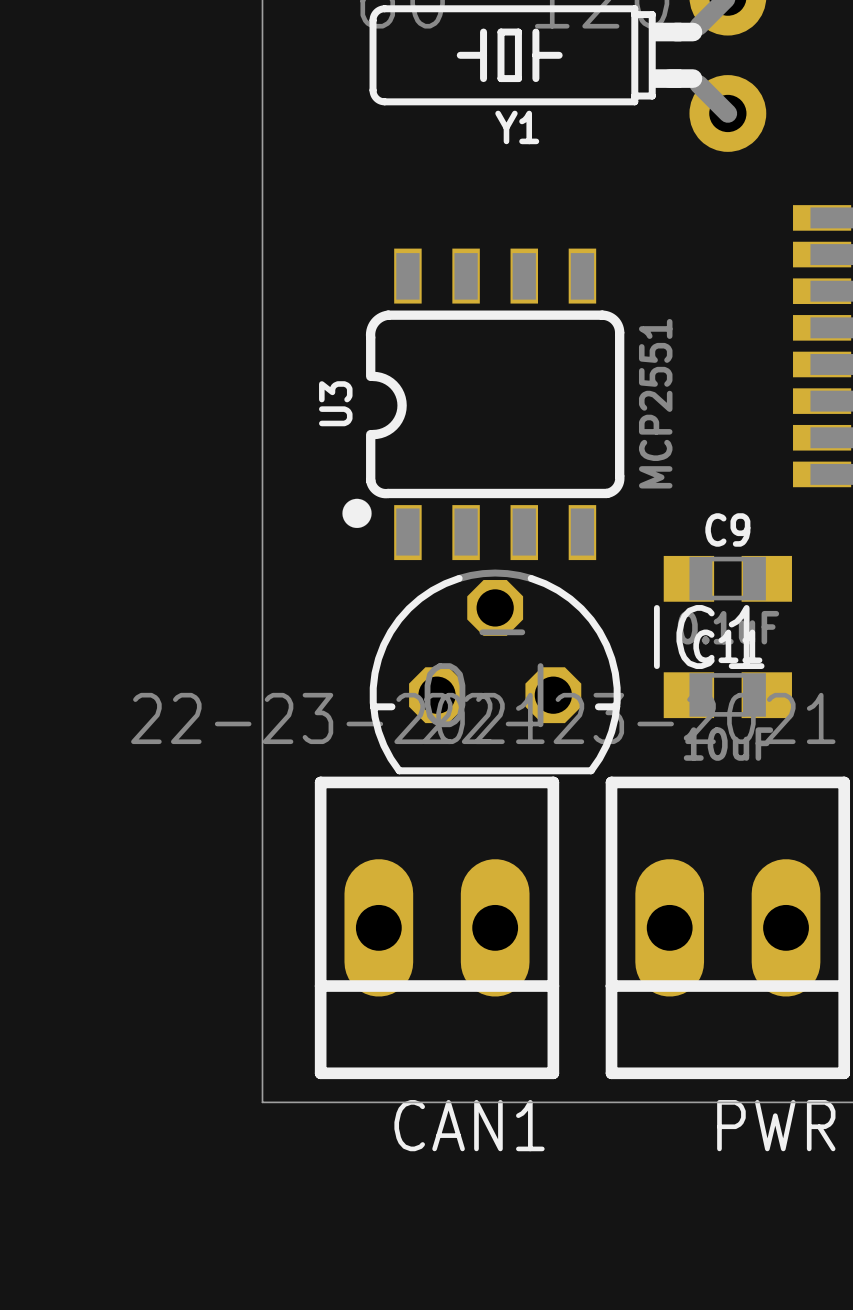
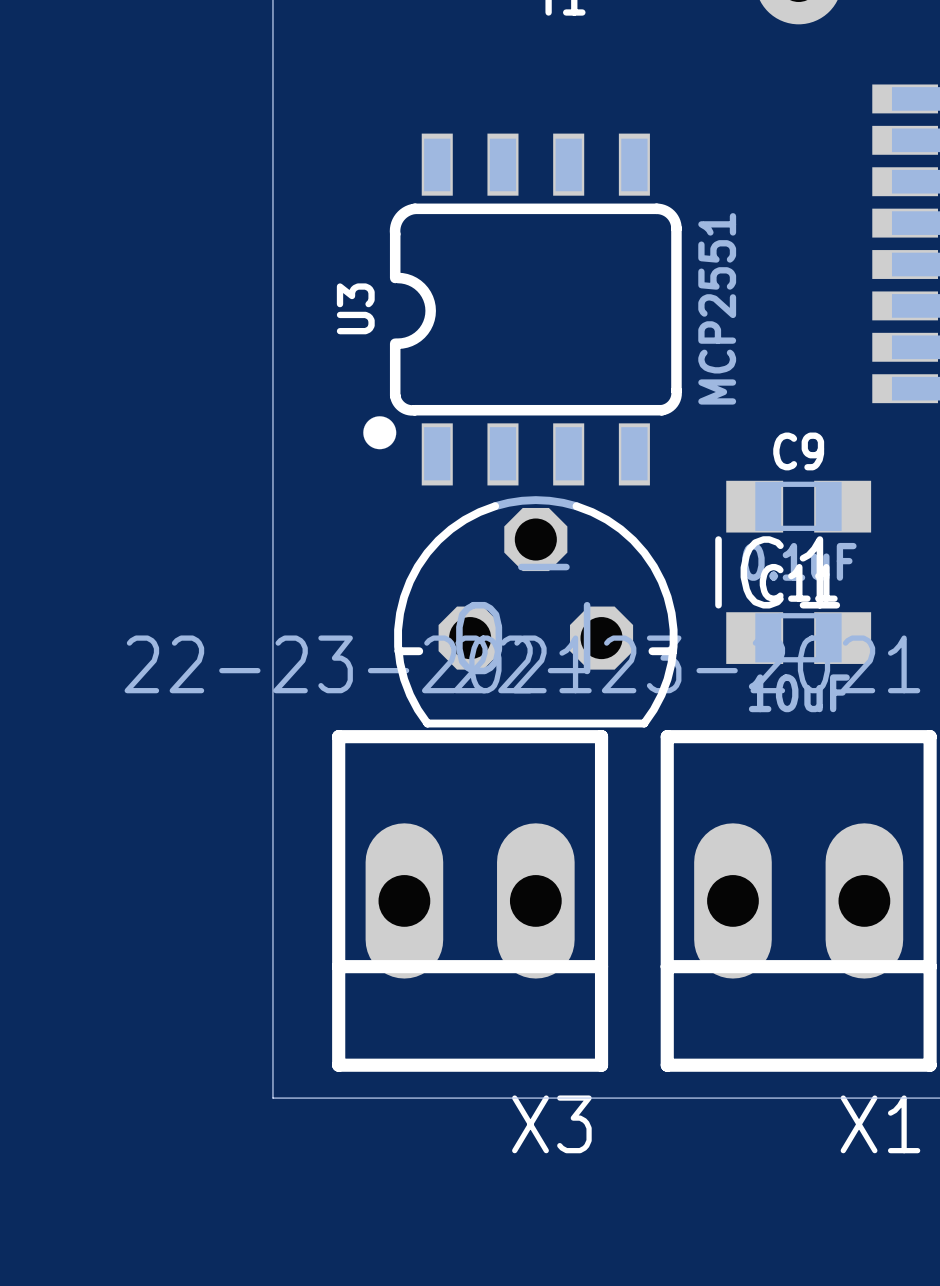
CAN1 name: CAN1 (469, 1125) -> X3 (551, 1124)
PWR name: PWR (776, 1125) -> X1 (880, 1124)

